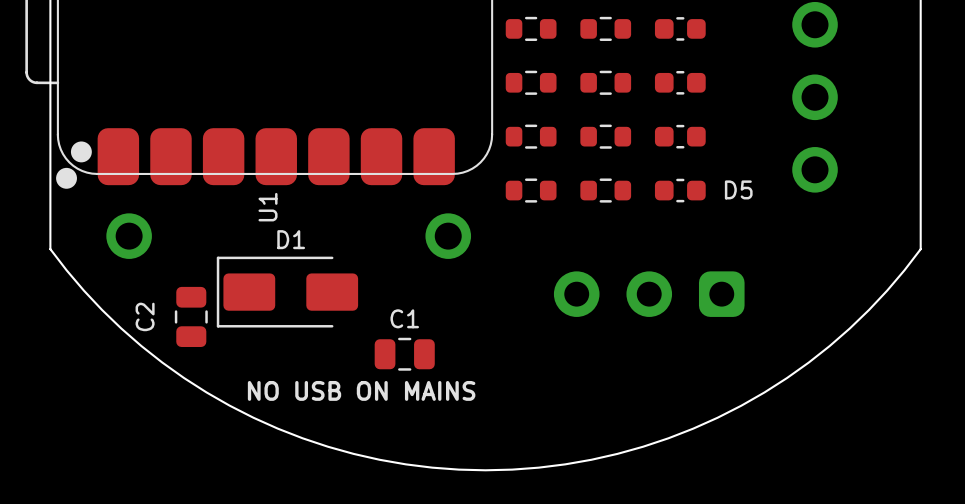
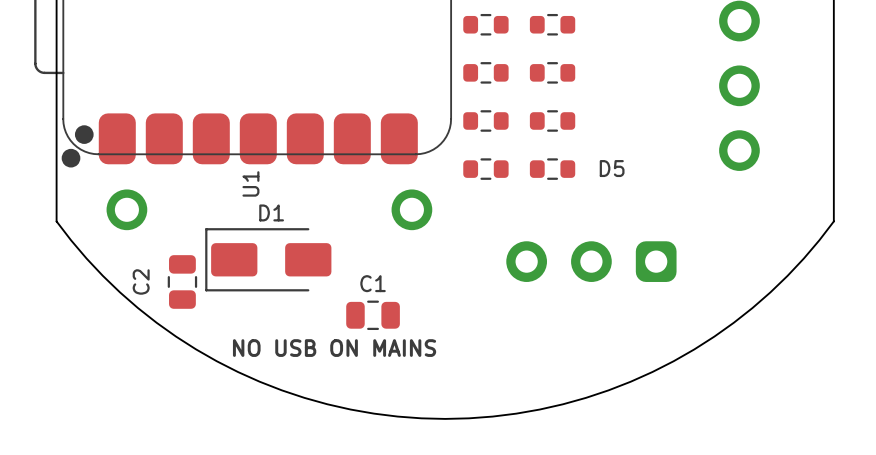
part: (680, 28) -> none
part: (680, 82) -> none
part: (680, 136) -> none
text position: D5 (738, 189) -> D5 (612, 168)
part: (680, 190) -> none

